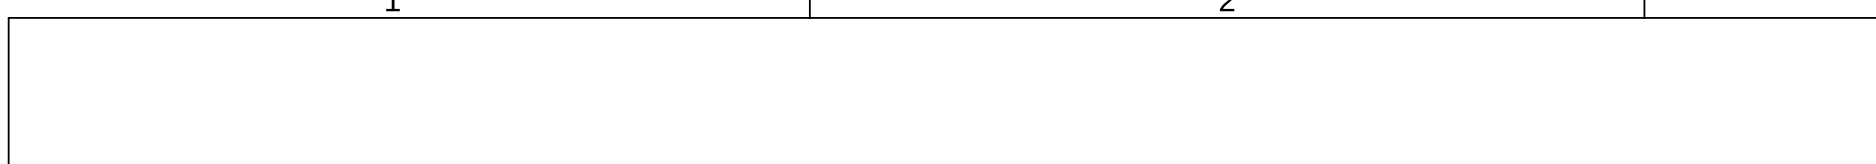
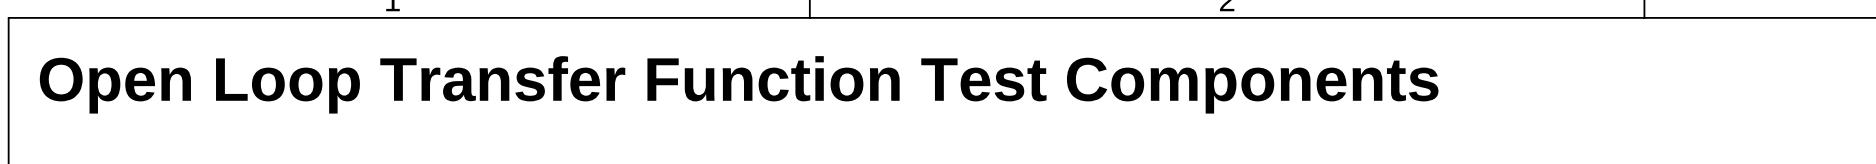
text: none -> Open Loop Transfer Function Test Components (739, 84)

